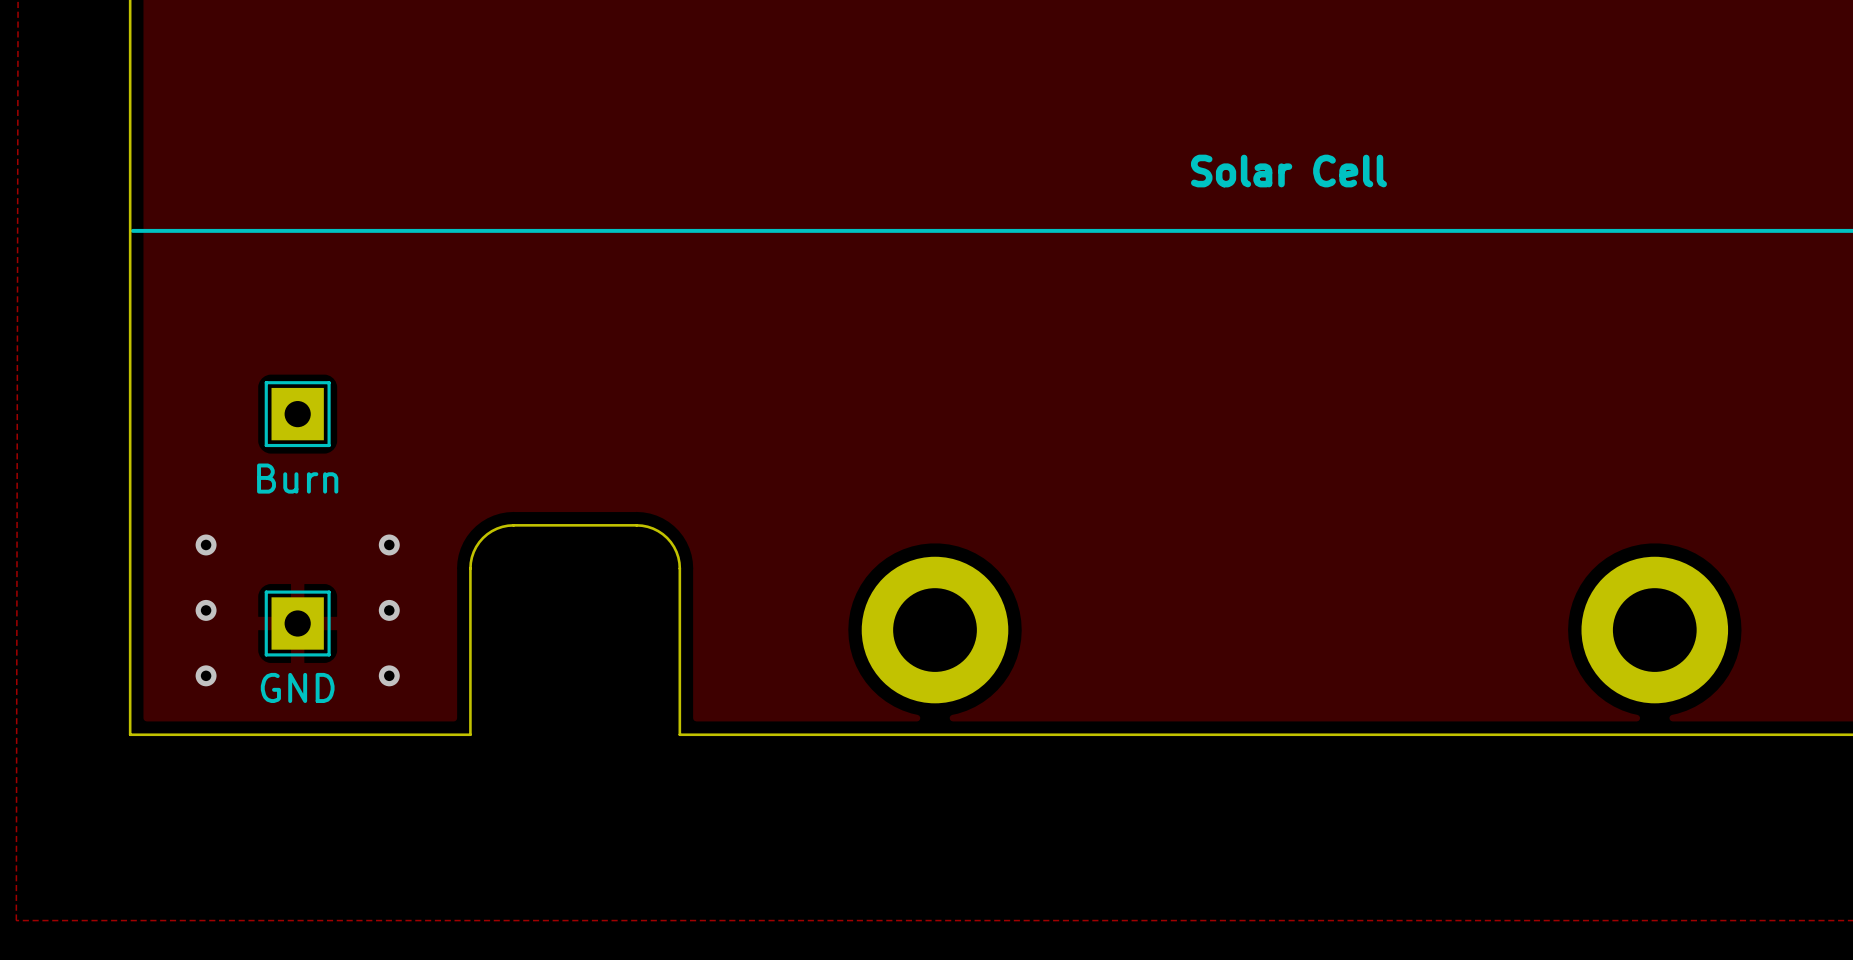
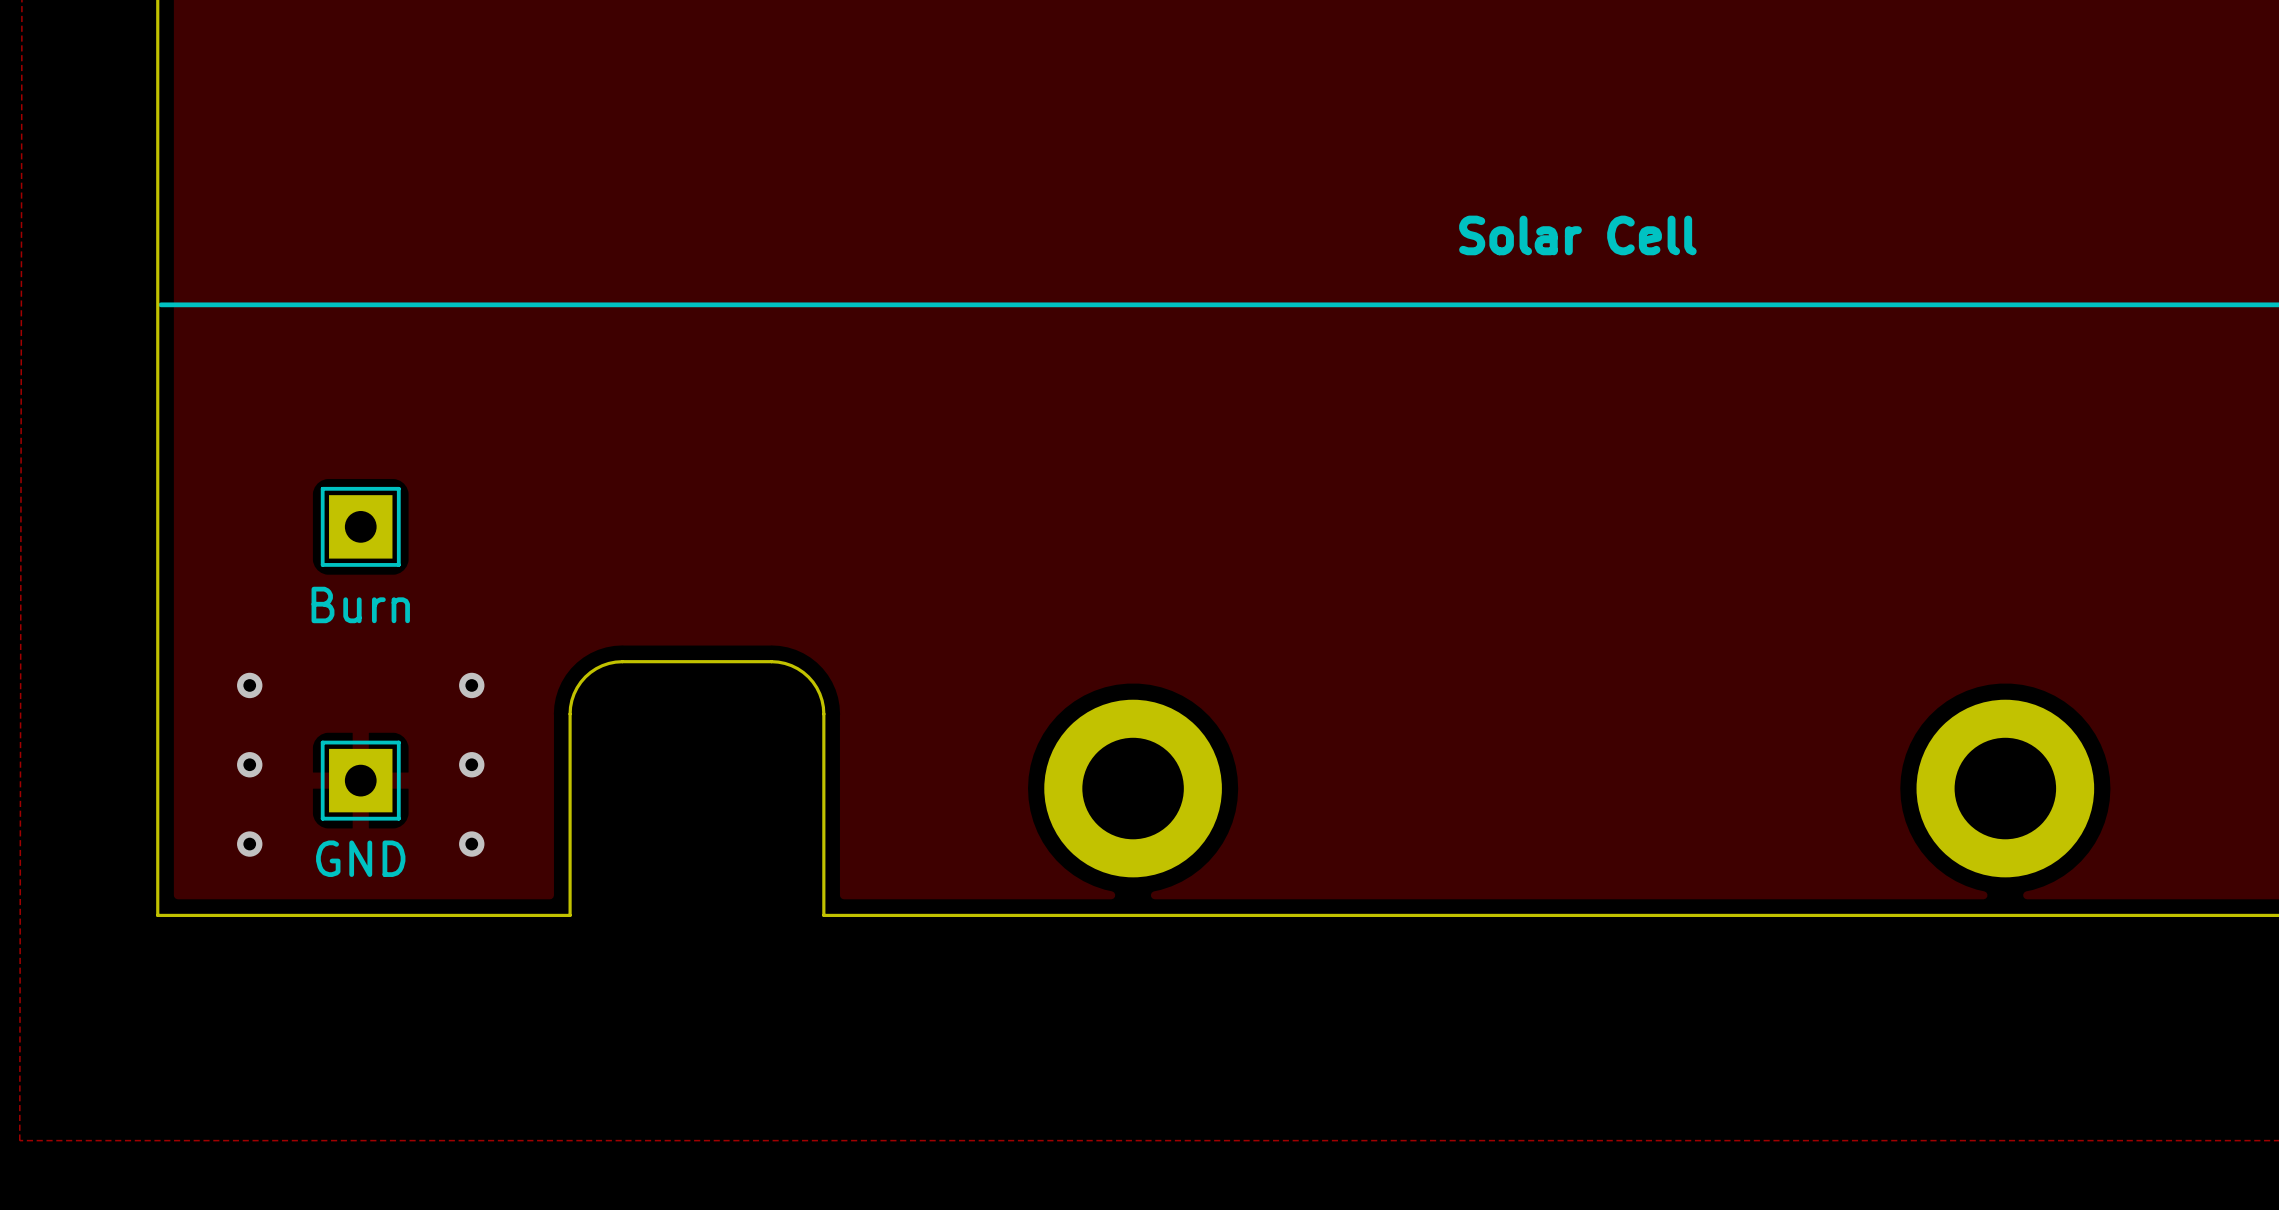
text position: Solar Cell (1288, 171) -> Solar Cell (1577, 235)

